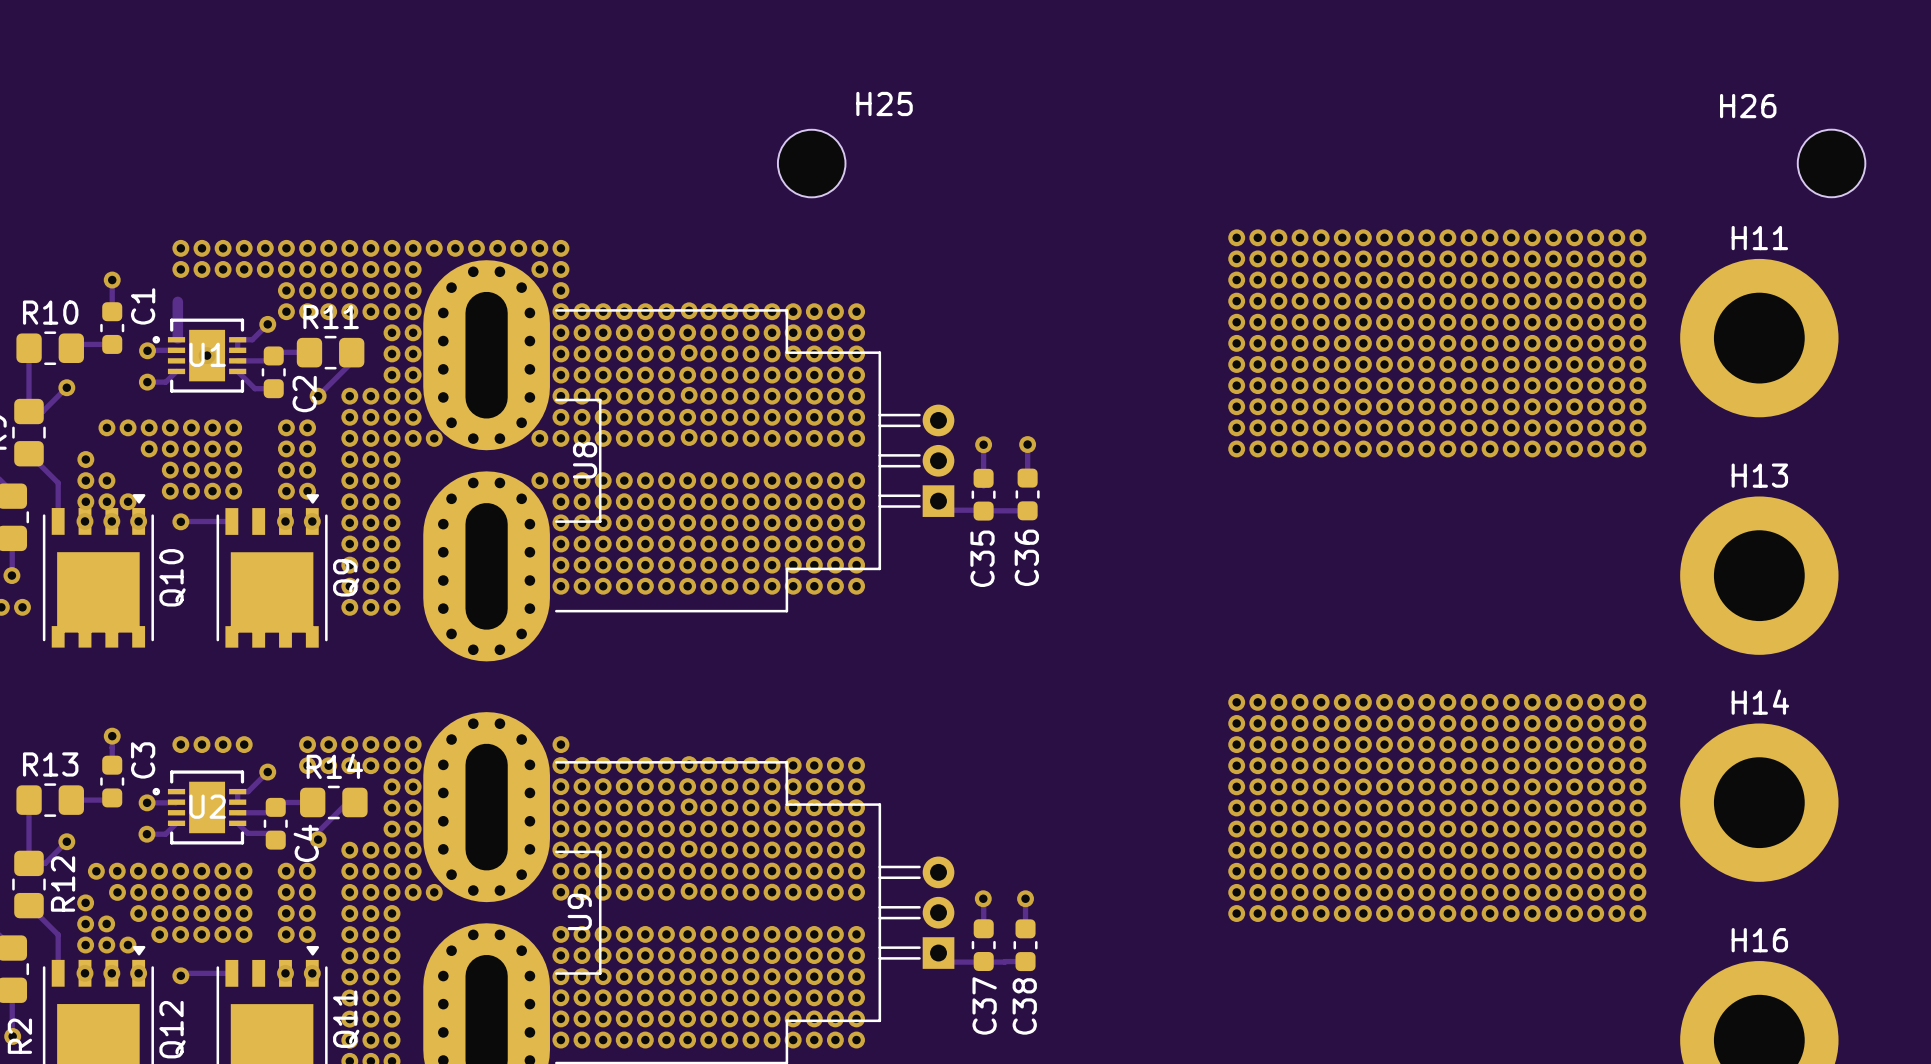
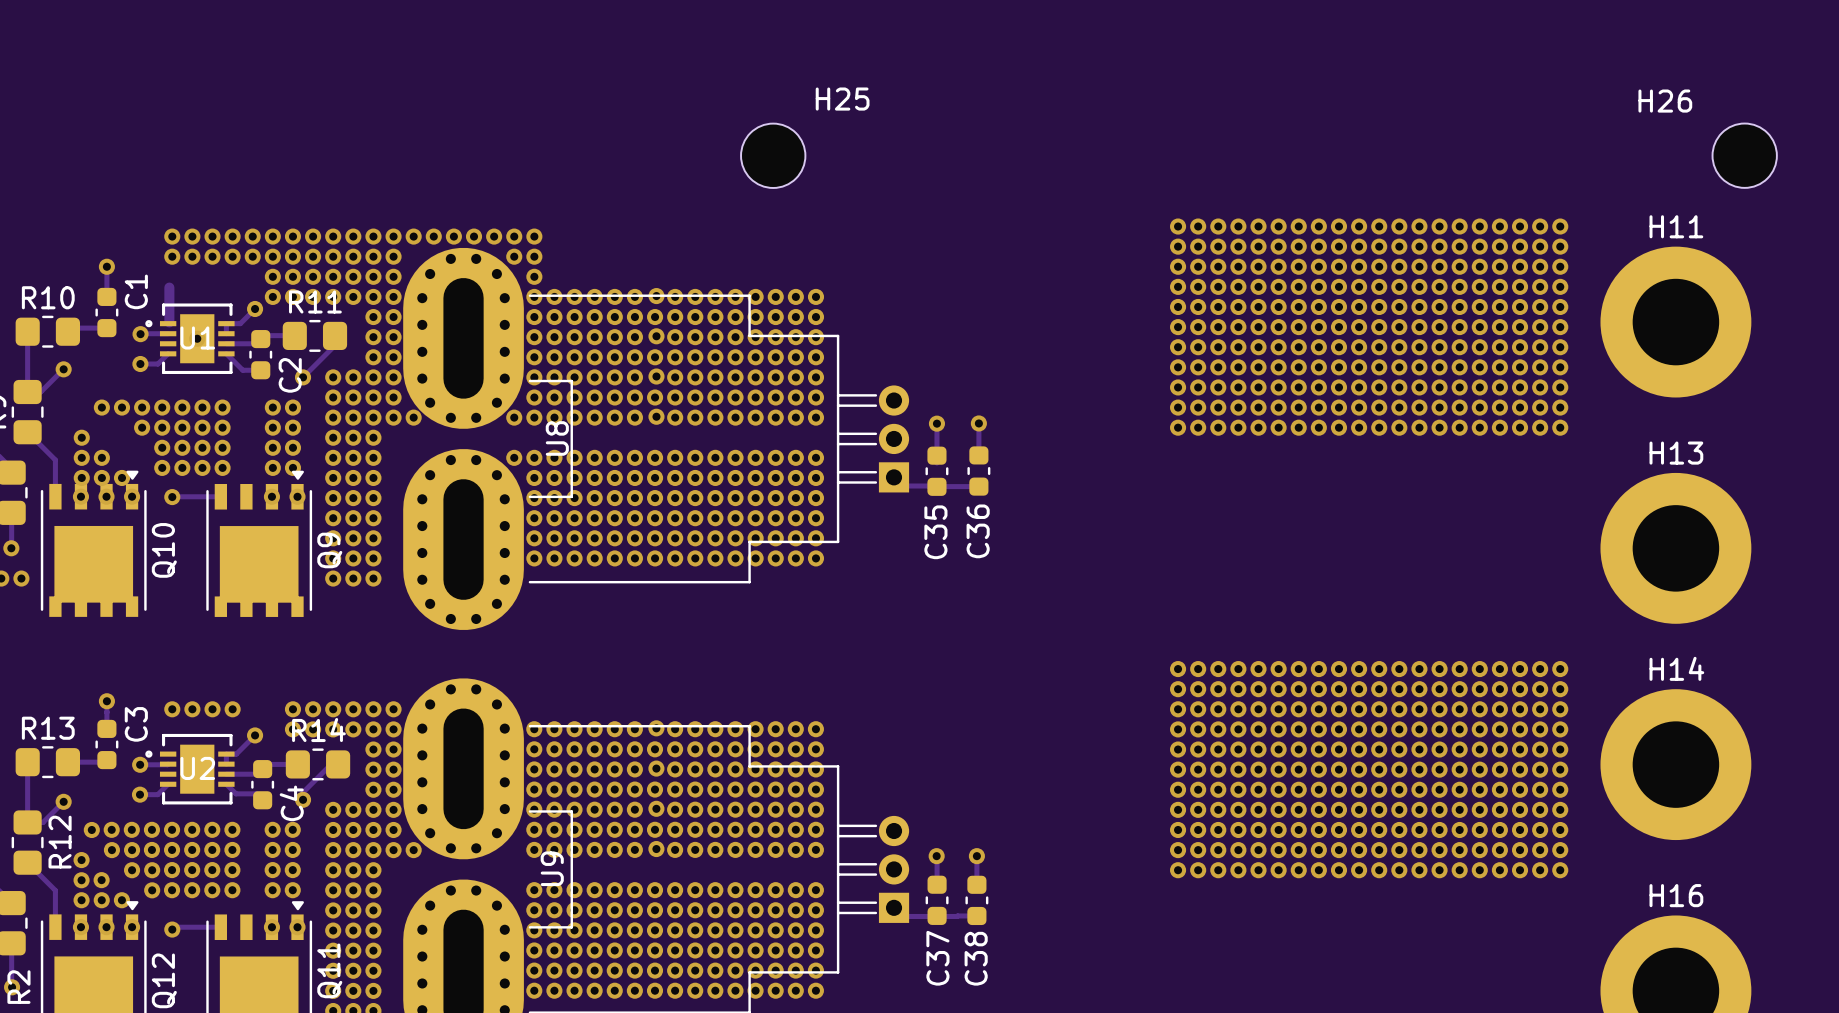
via: (560, 744) -> none

